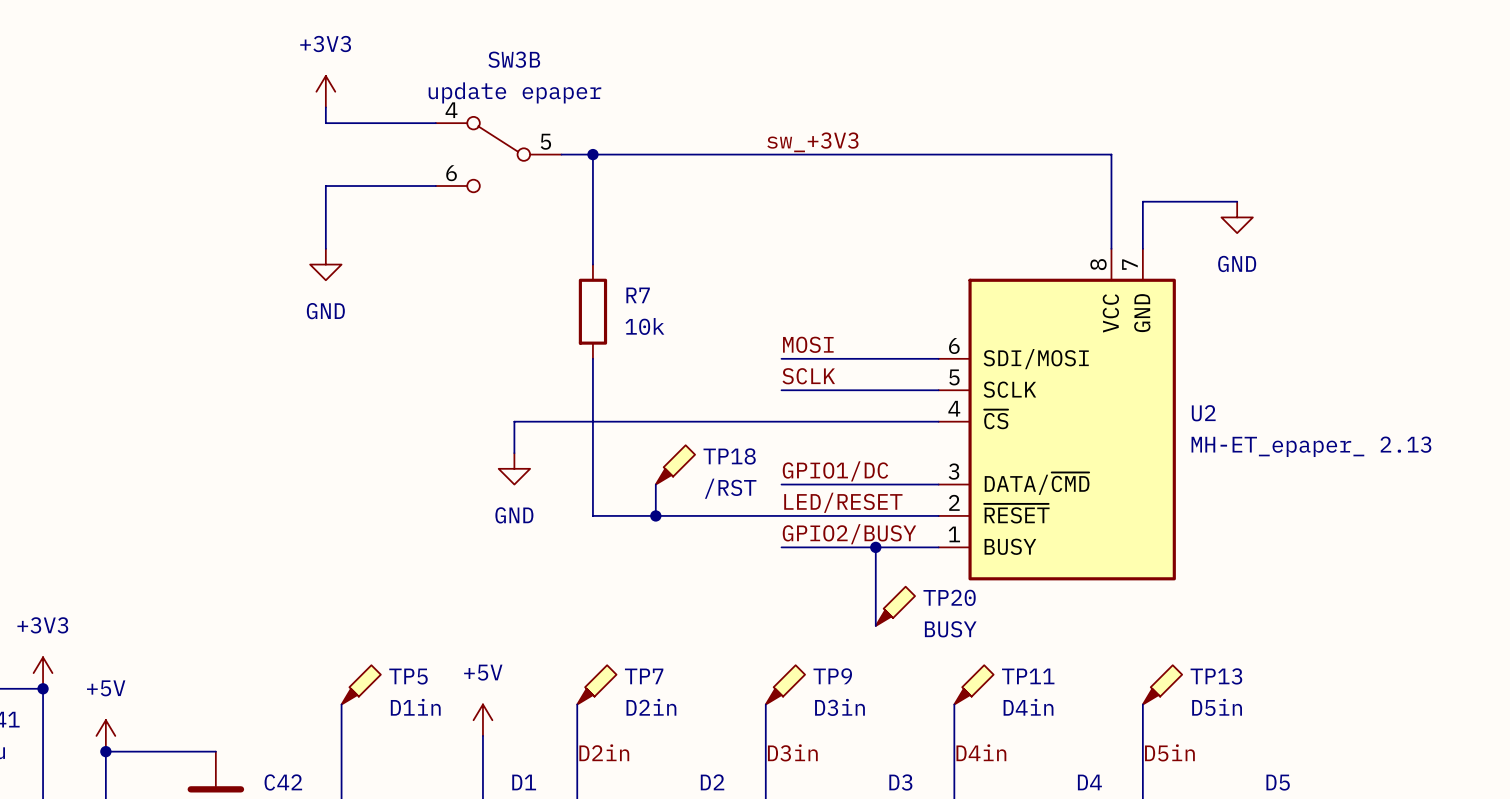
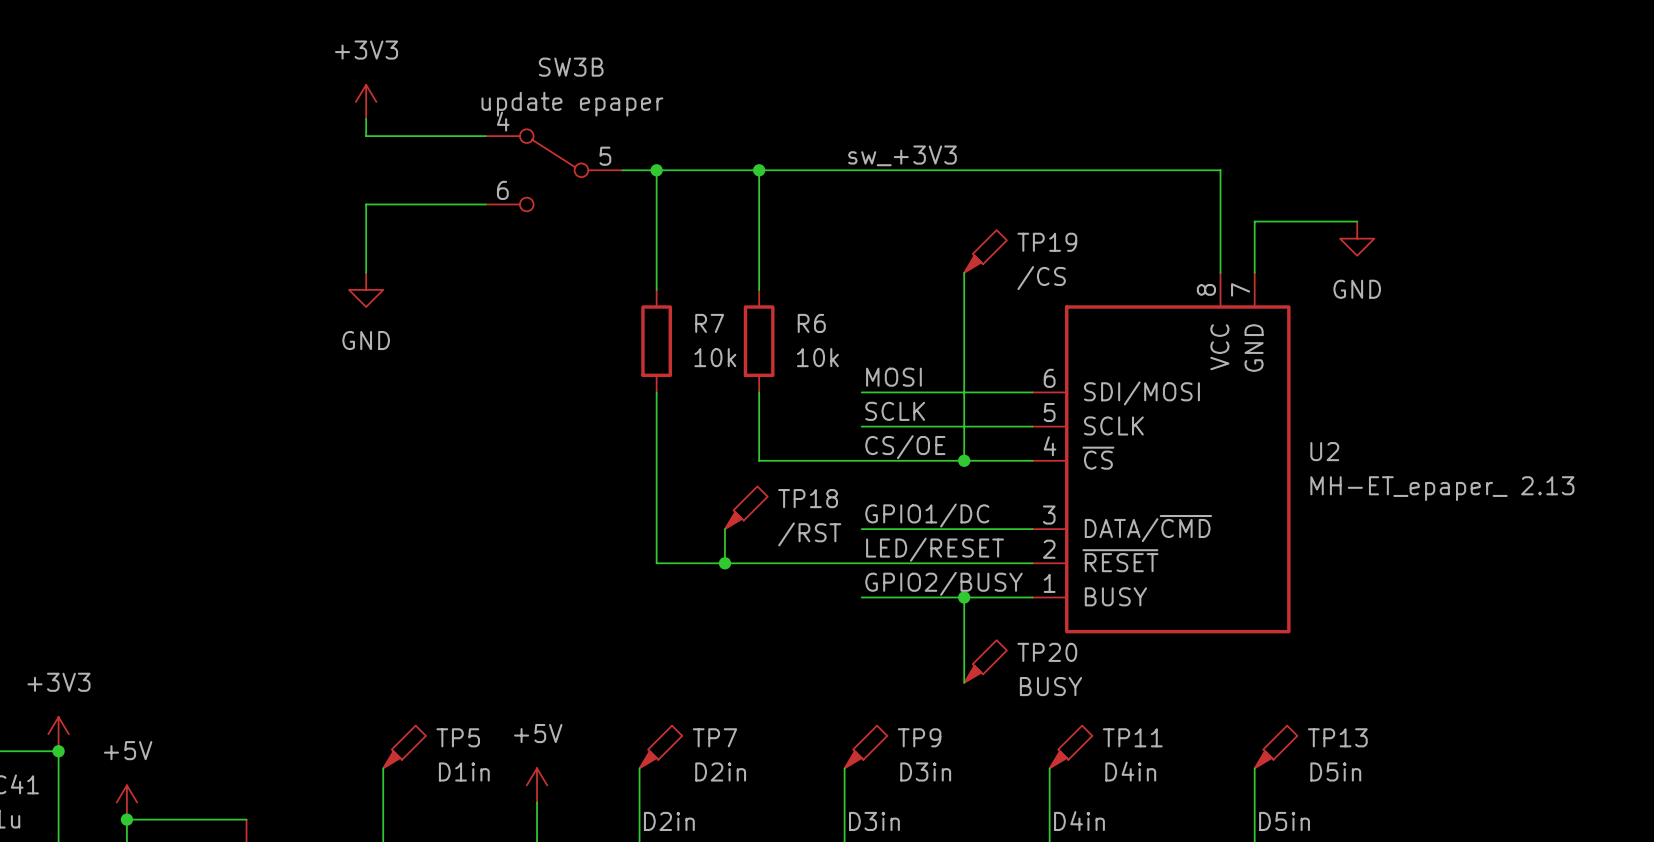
wire: none -> (759, 170) (759, 289)
junction: none -> (759, 170)
TP19: none -> /CS (985, 251)
wire: none -> (964, 272) (964, 460)
R6: none -> 10k (759, 341)
label: none -> CS/OE (905, 447)
wire: (687, 421) (514, 421) (514, 453) -> (759, 460) (759, 392)
junction: none -> (964, 460)
power symbol: GND (514, 468) -> none

